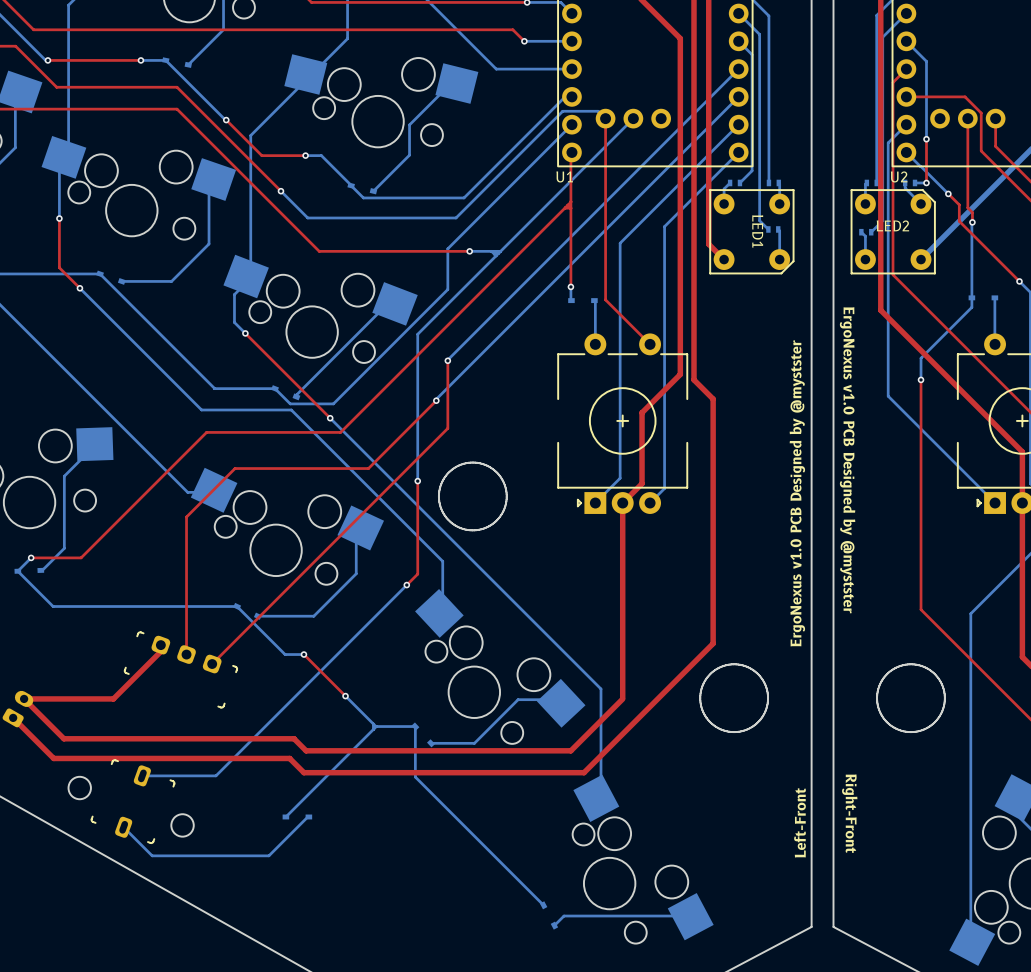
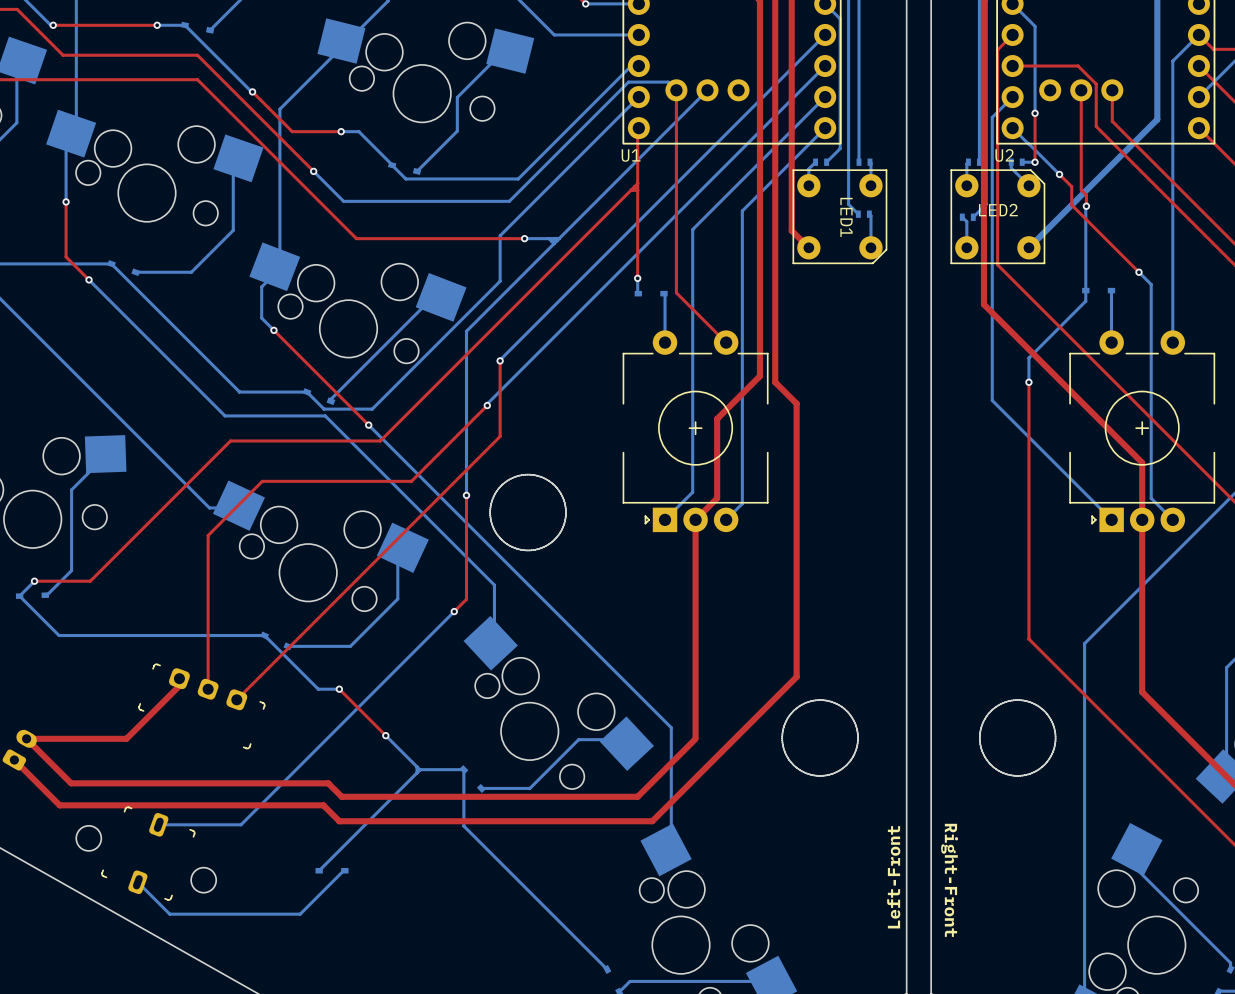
text: ErgoNexus v1.0 PCB Designed by @mystster (847, 460) -> none
text: ErgoNexus v1.0 PCB Designed by @mystster (797, 493) -> none

